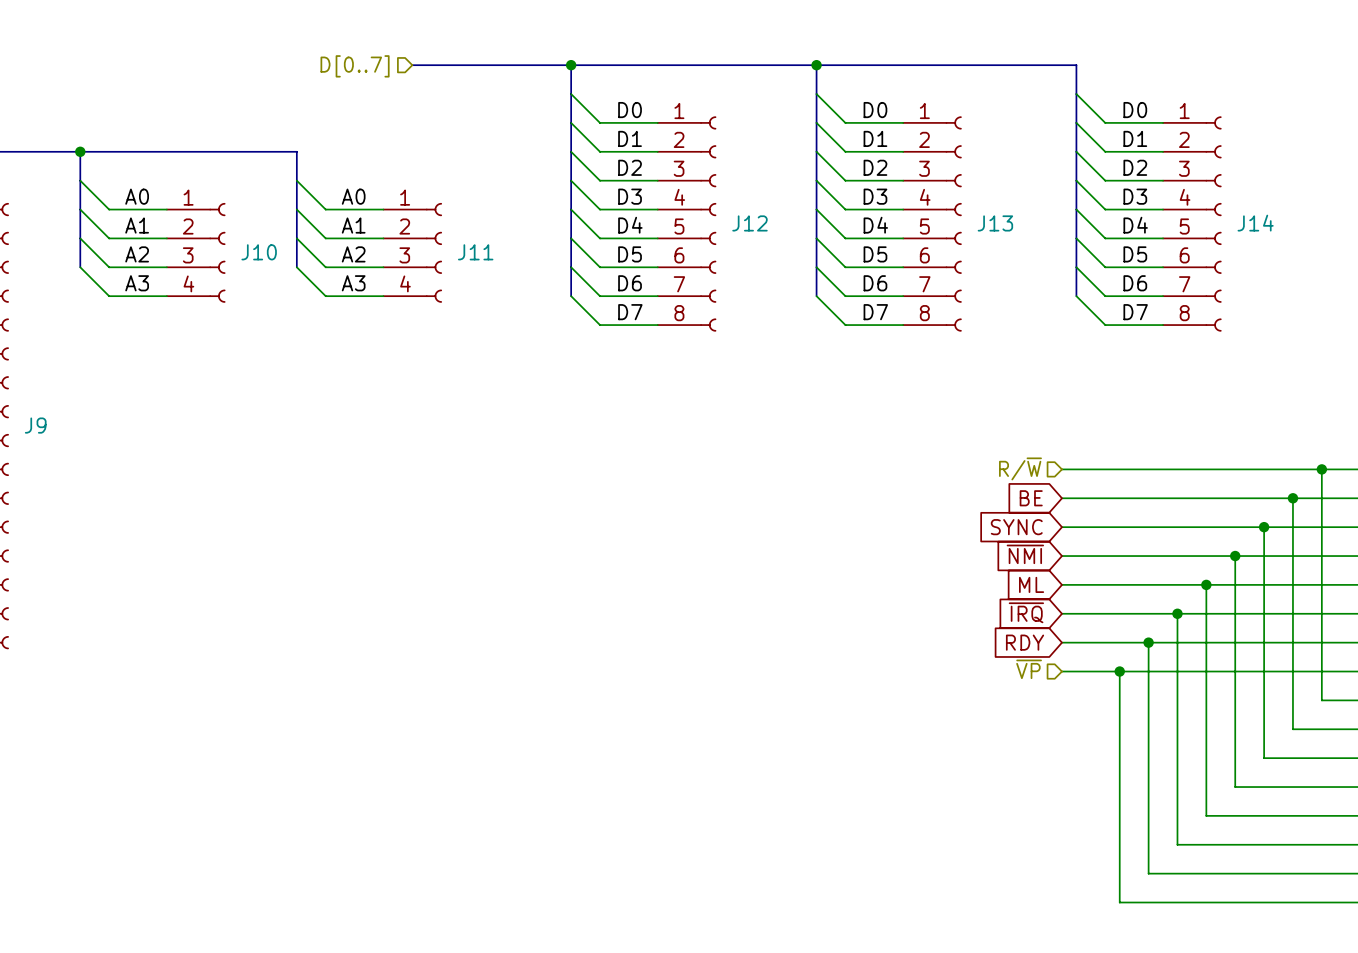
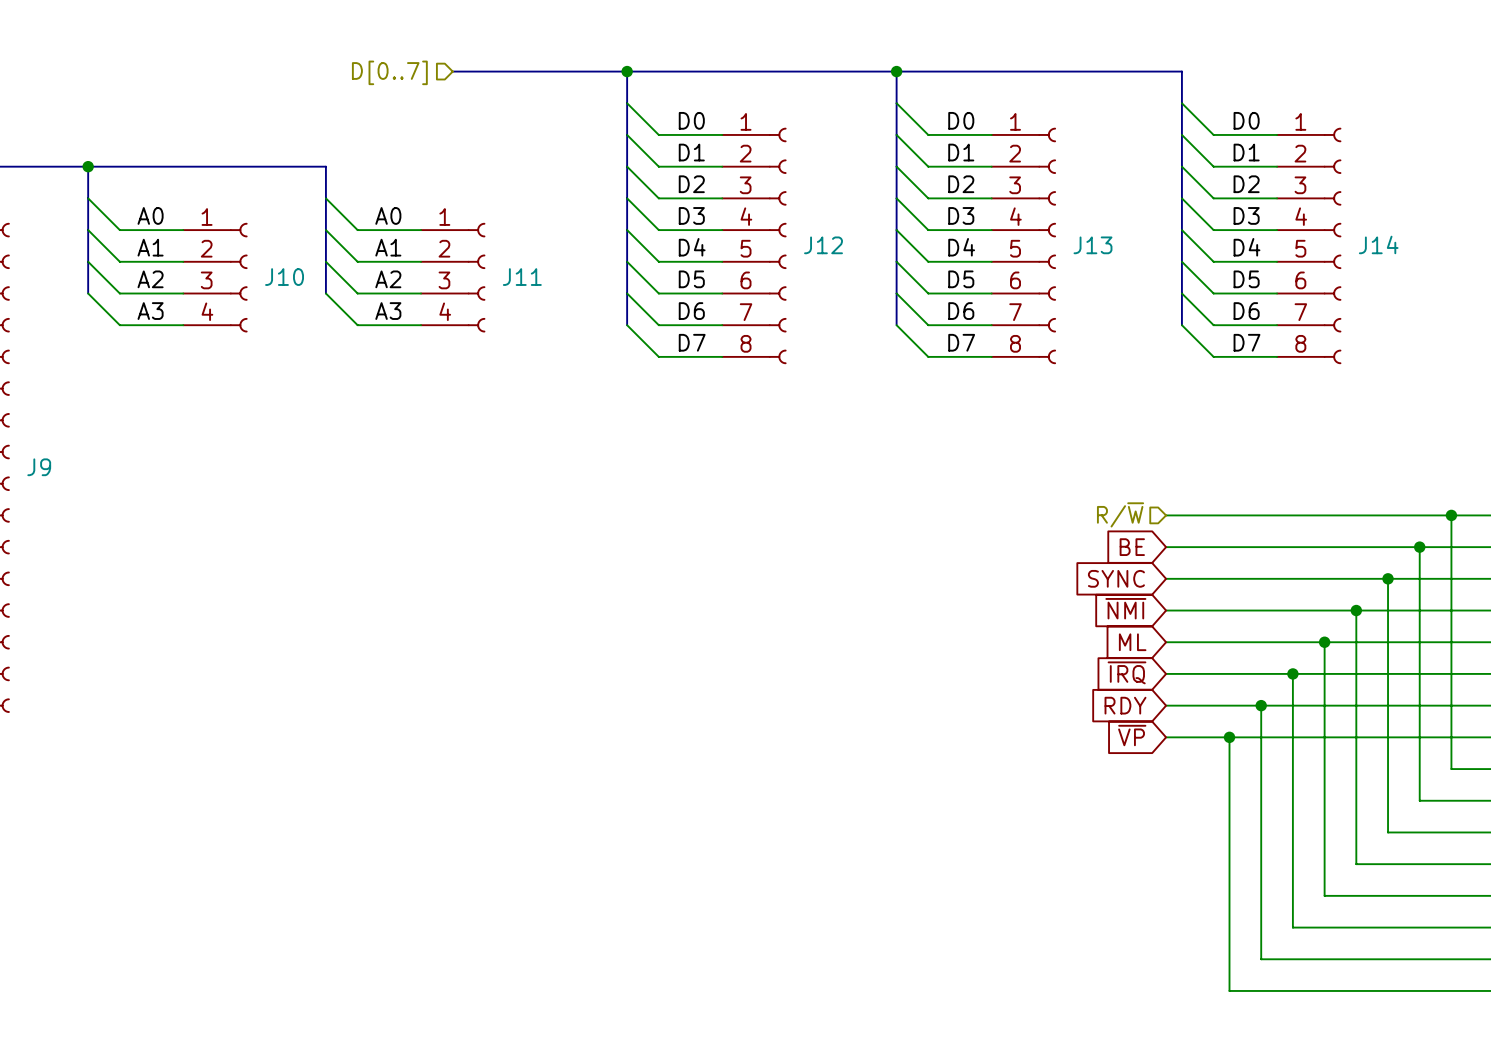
hierarchical label: ~{VP} (1029, 669) -> none
global label: none -> ~{VP} (1132, 735)

